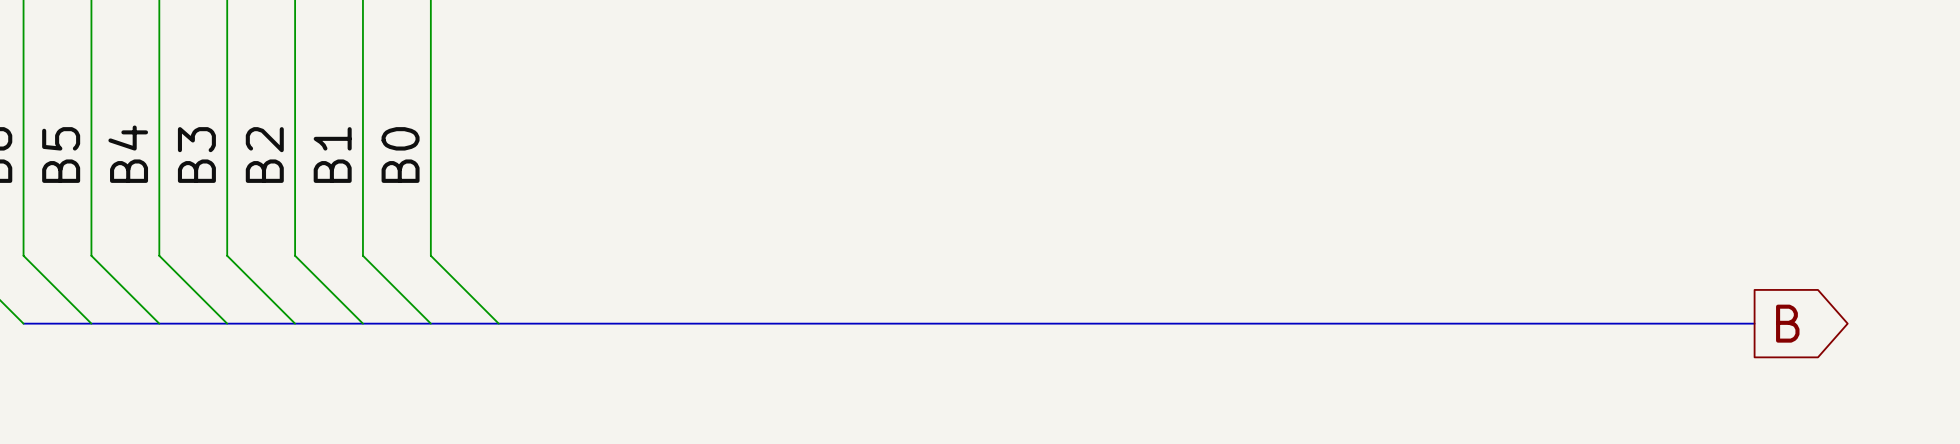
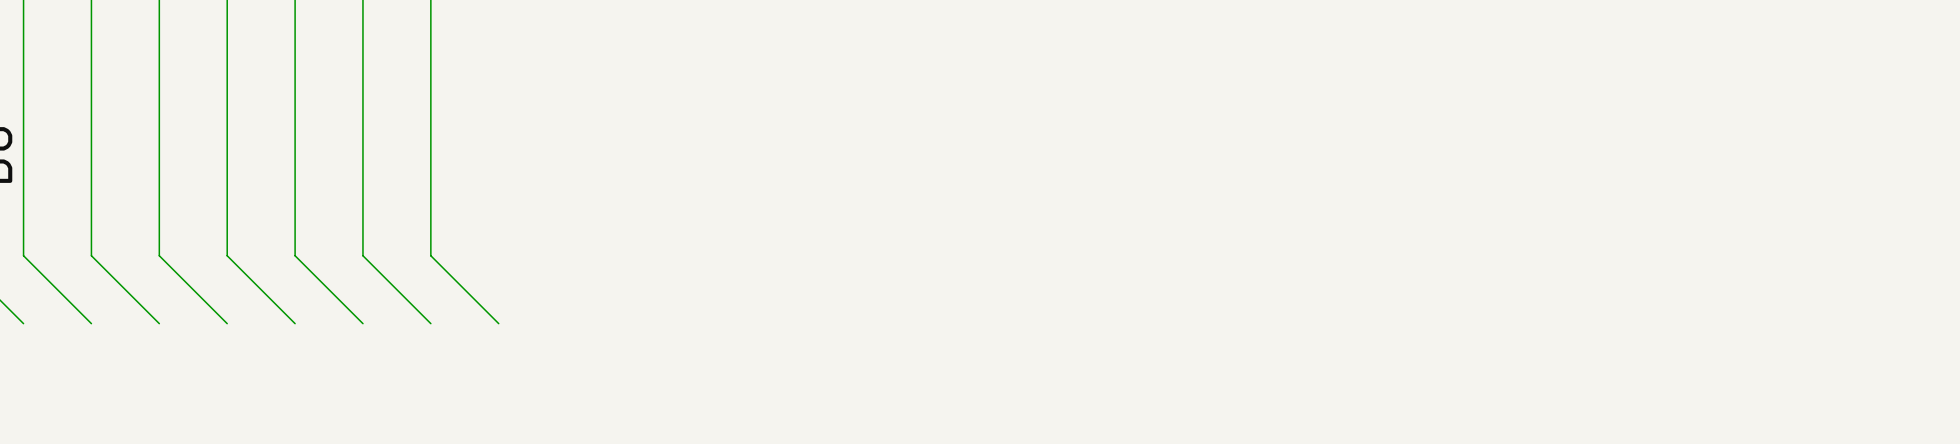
label: B4 (128, 154) -> none
label: B5 (61, 155) -> none
label: B3 (196, 155) -> none
label: B2 (264, 155) -> none
label: B1 (332, 155) -> none
label: B0 (400, 155) -> none
bus: (23, 323) (1754, 323) -> none
global label: B (1787, 323) -> none

